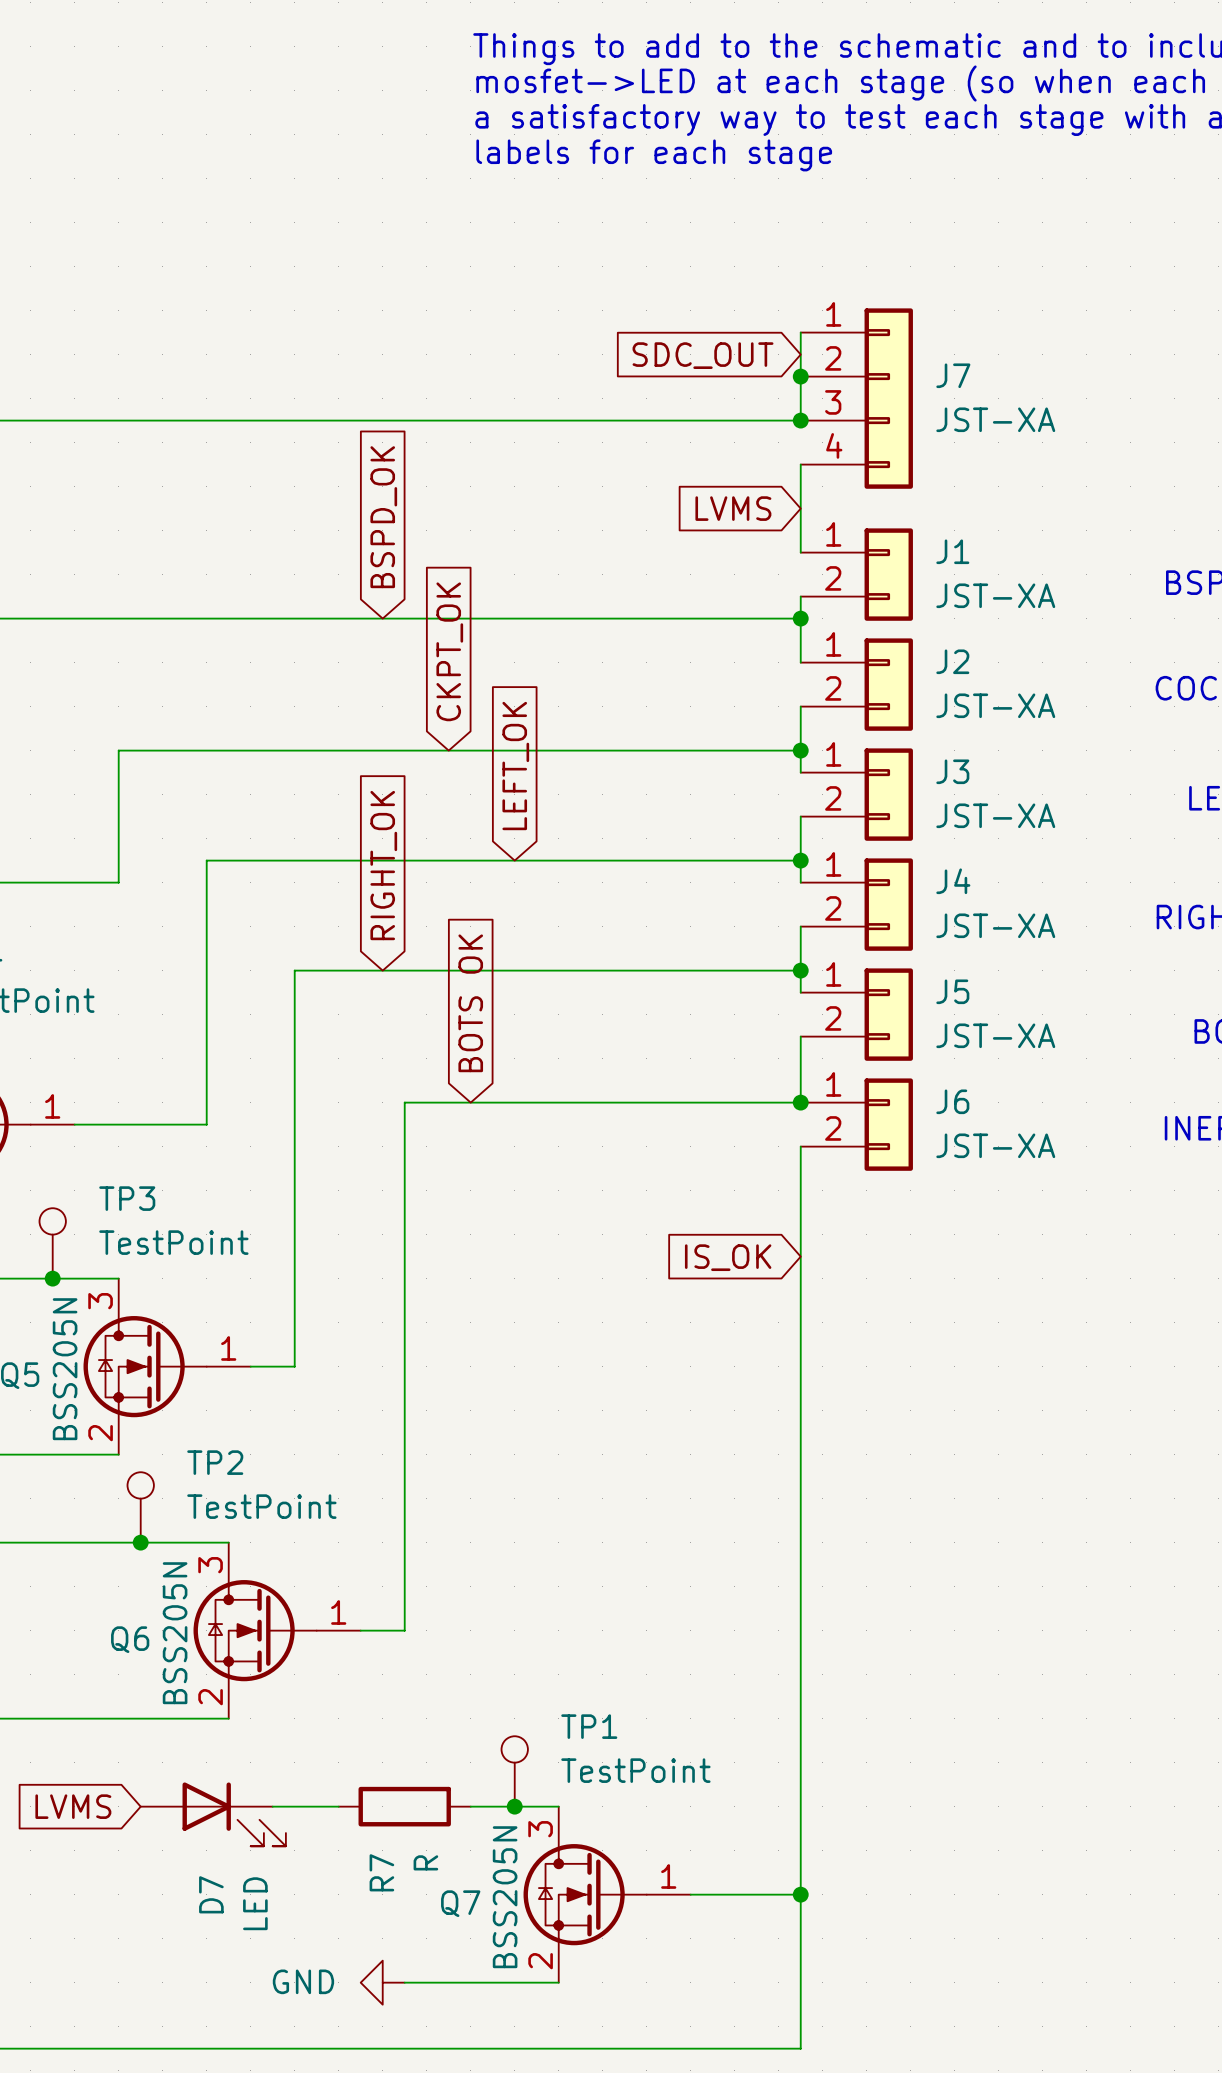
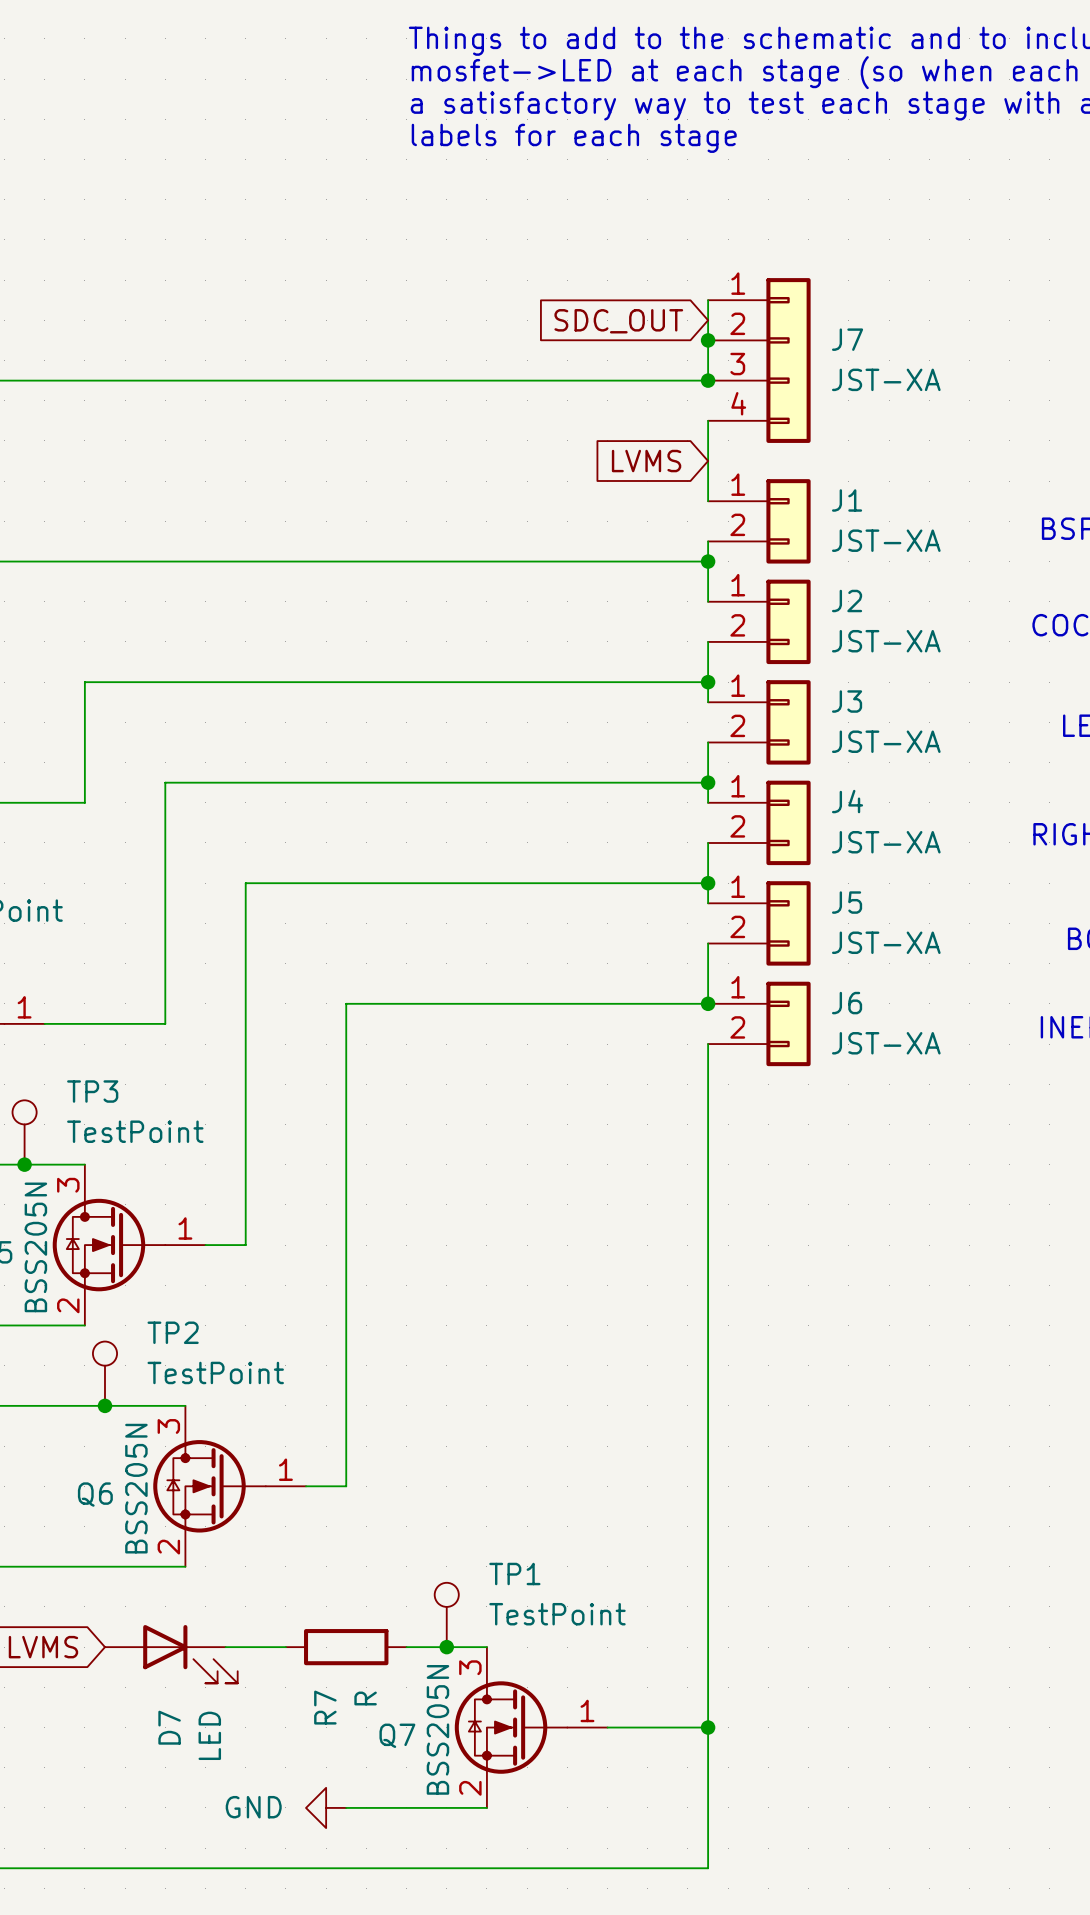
global label: BSPD_OK (383, 517) -> none
global label: CKPT_OK (449, 651) -> none
global label: LEFT_OK (515, 766) -> none
global label: RIGHT_OK (383, 865) -> none
global label: BOTS OK (470, 1003) -> none
global label: IS_OK (728, 1257) -> none

